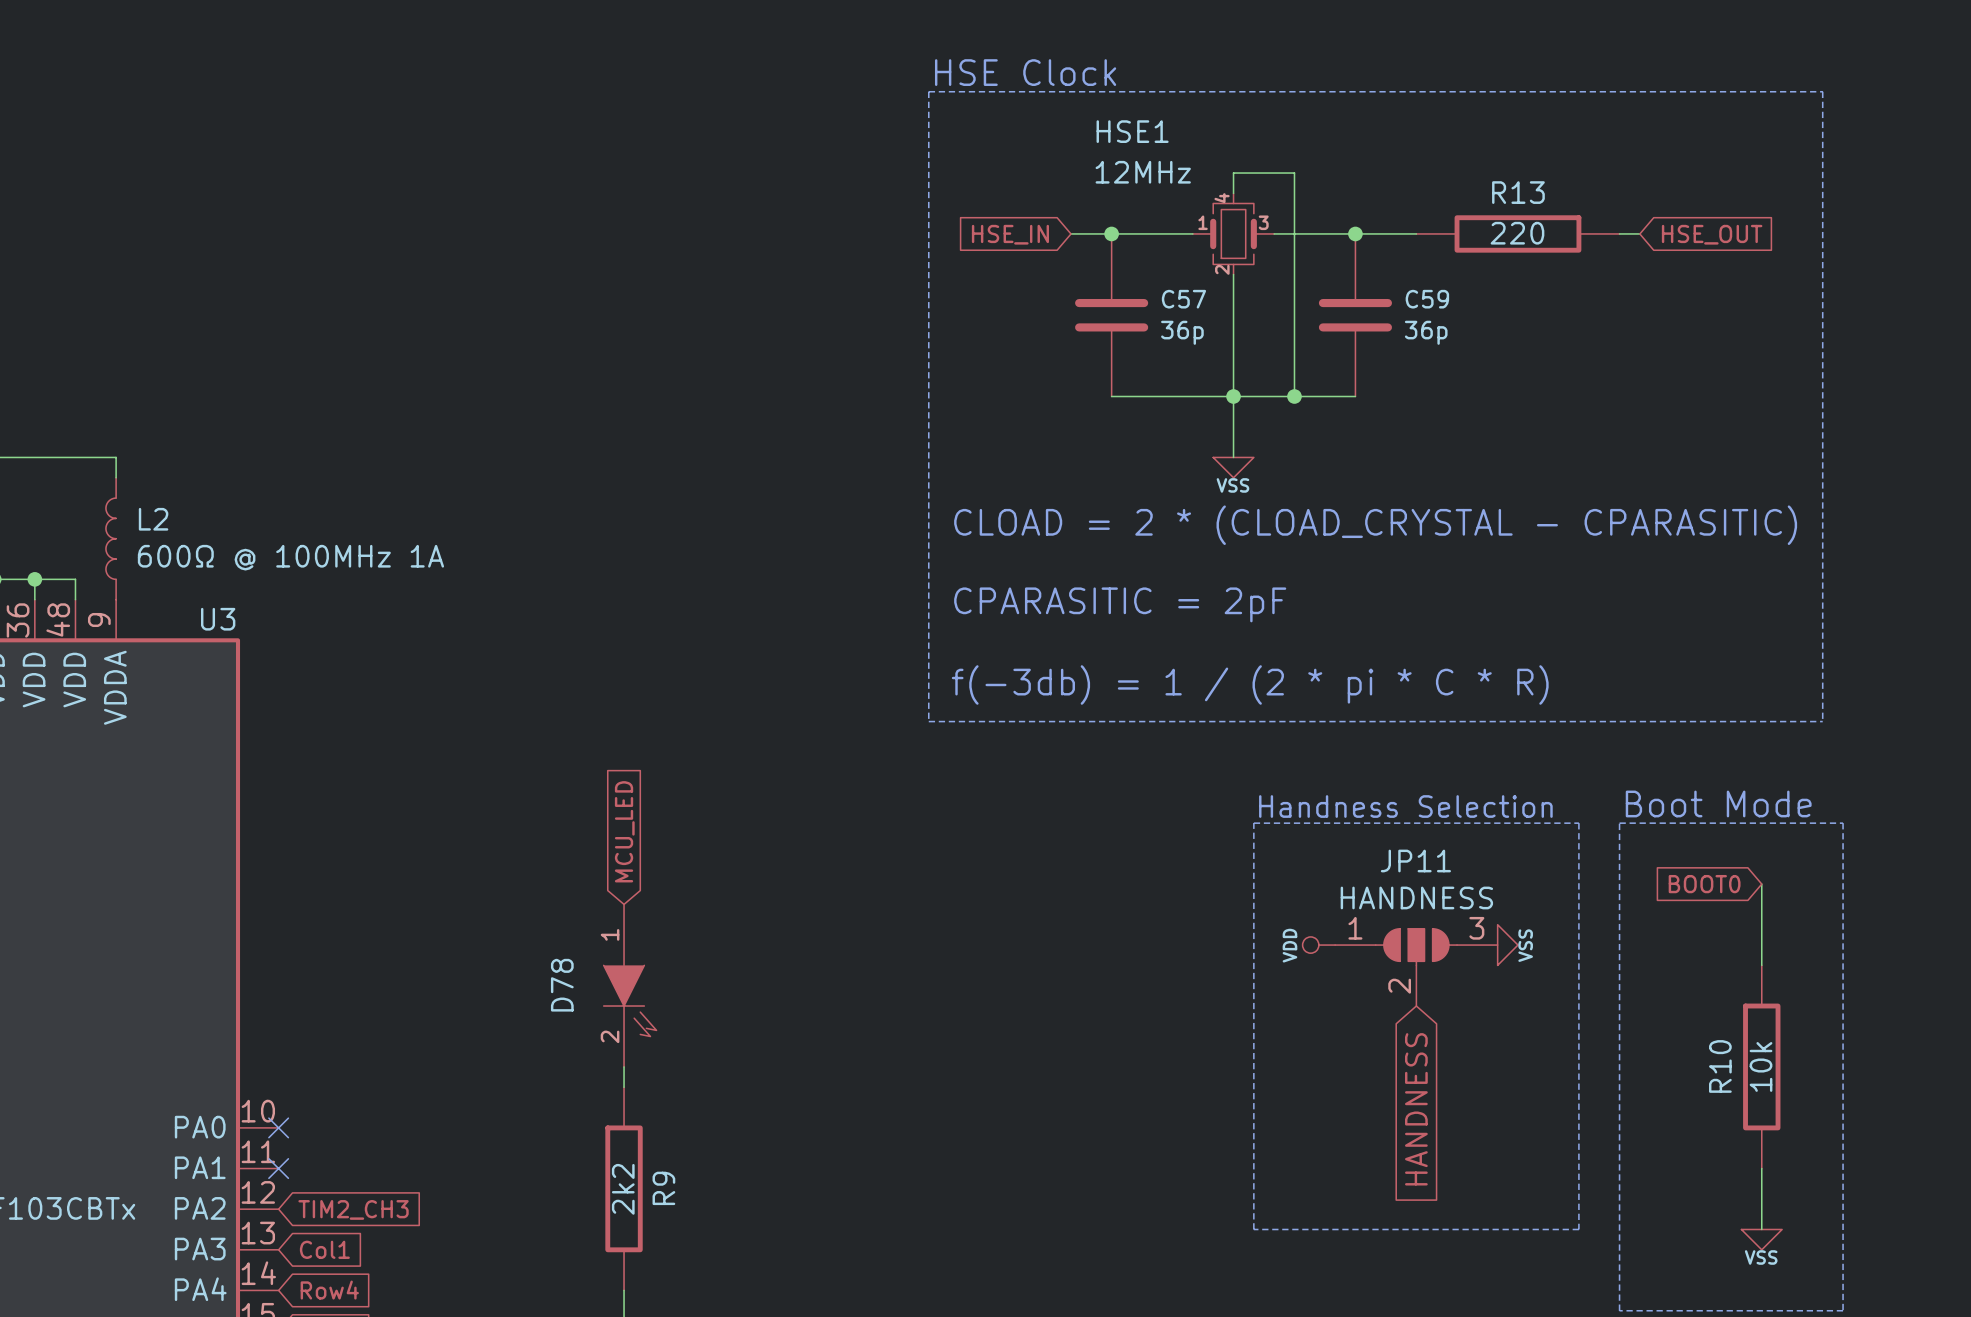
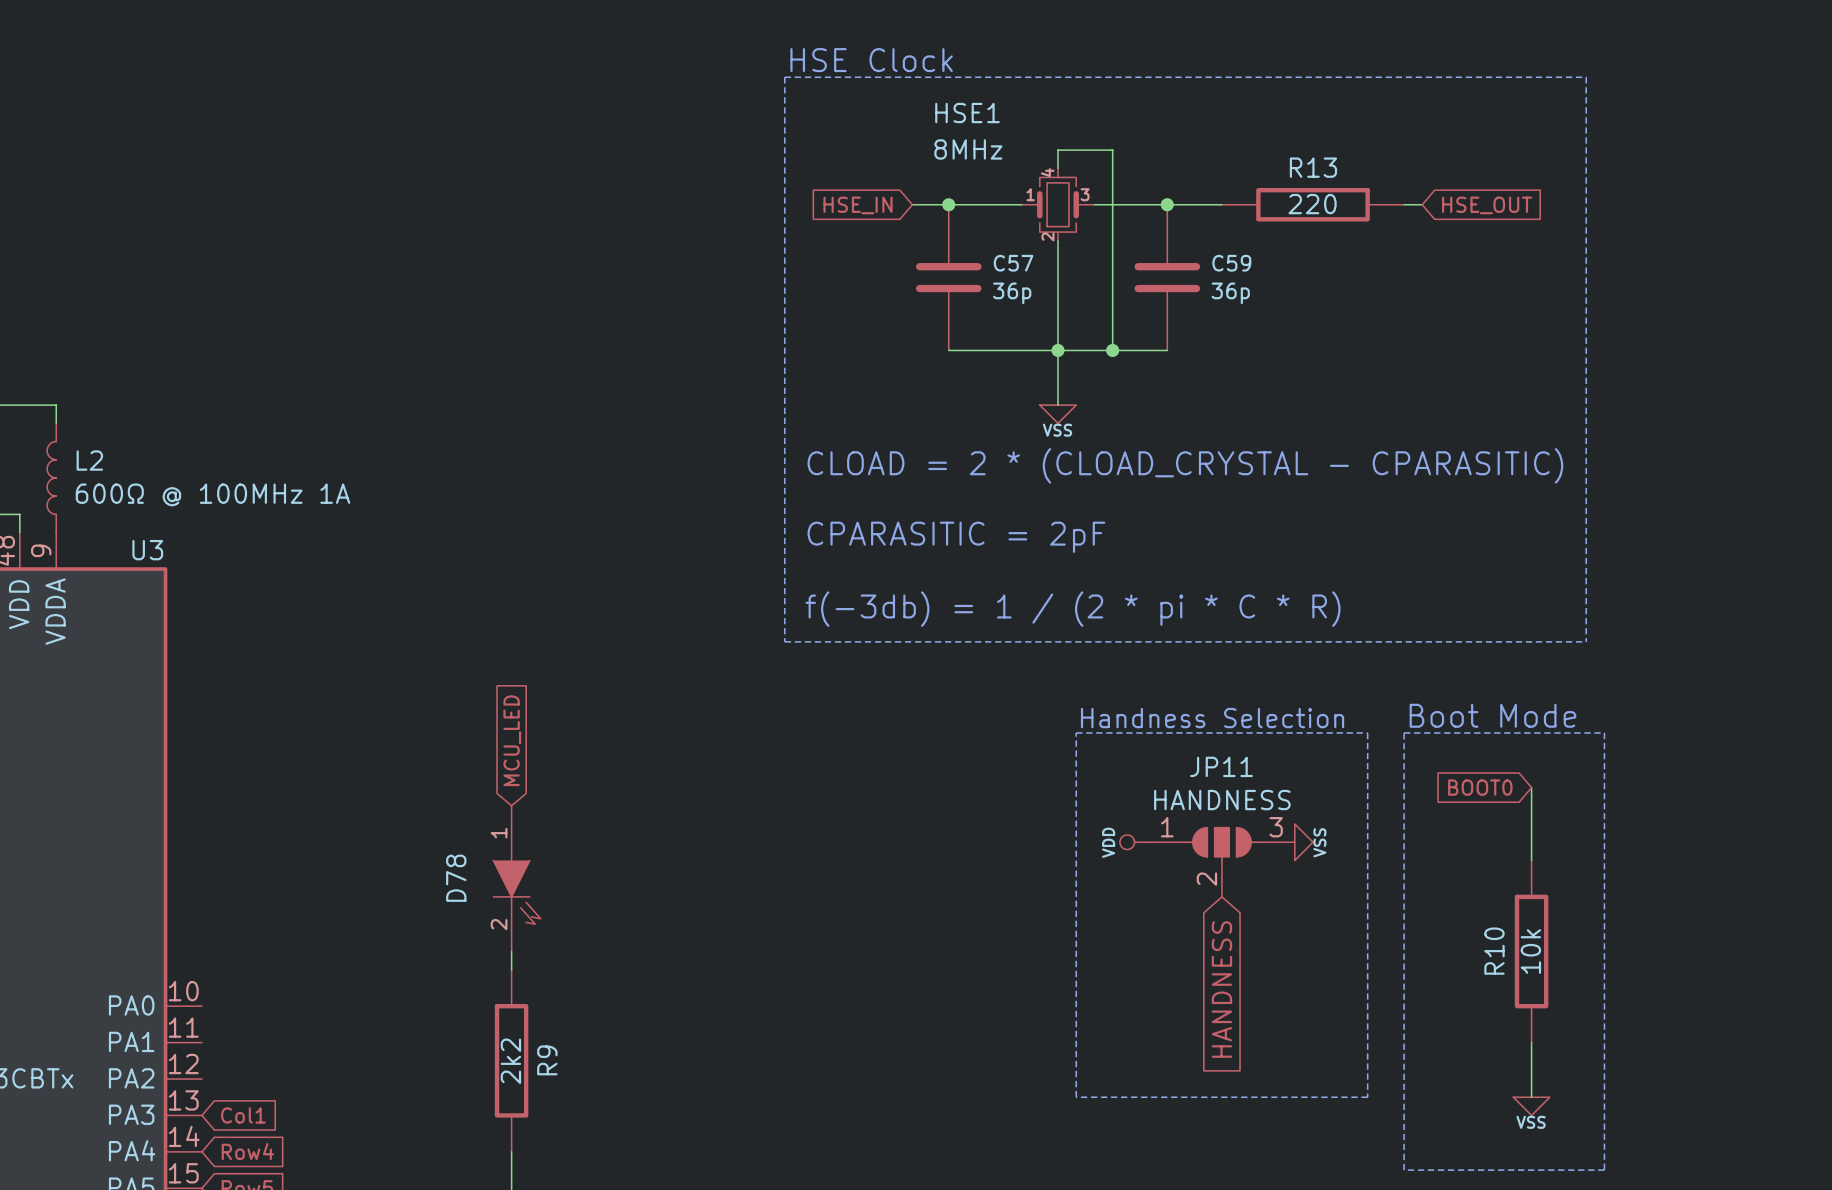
HSE1 value: 12MHz (1143, 172) -> 8MHz (968, 149)
no-connect mark: (278, 1127) -> none
no-connect mark: (278, 1168) -> none
global label: TIM2_CH3 (353, 1209) -> none

